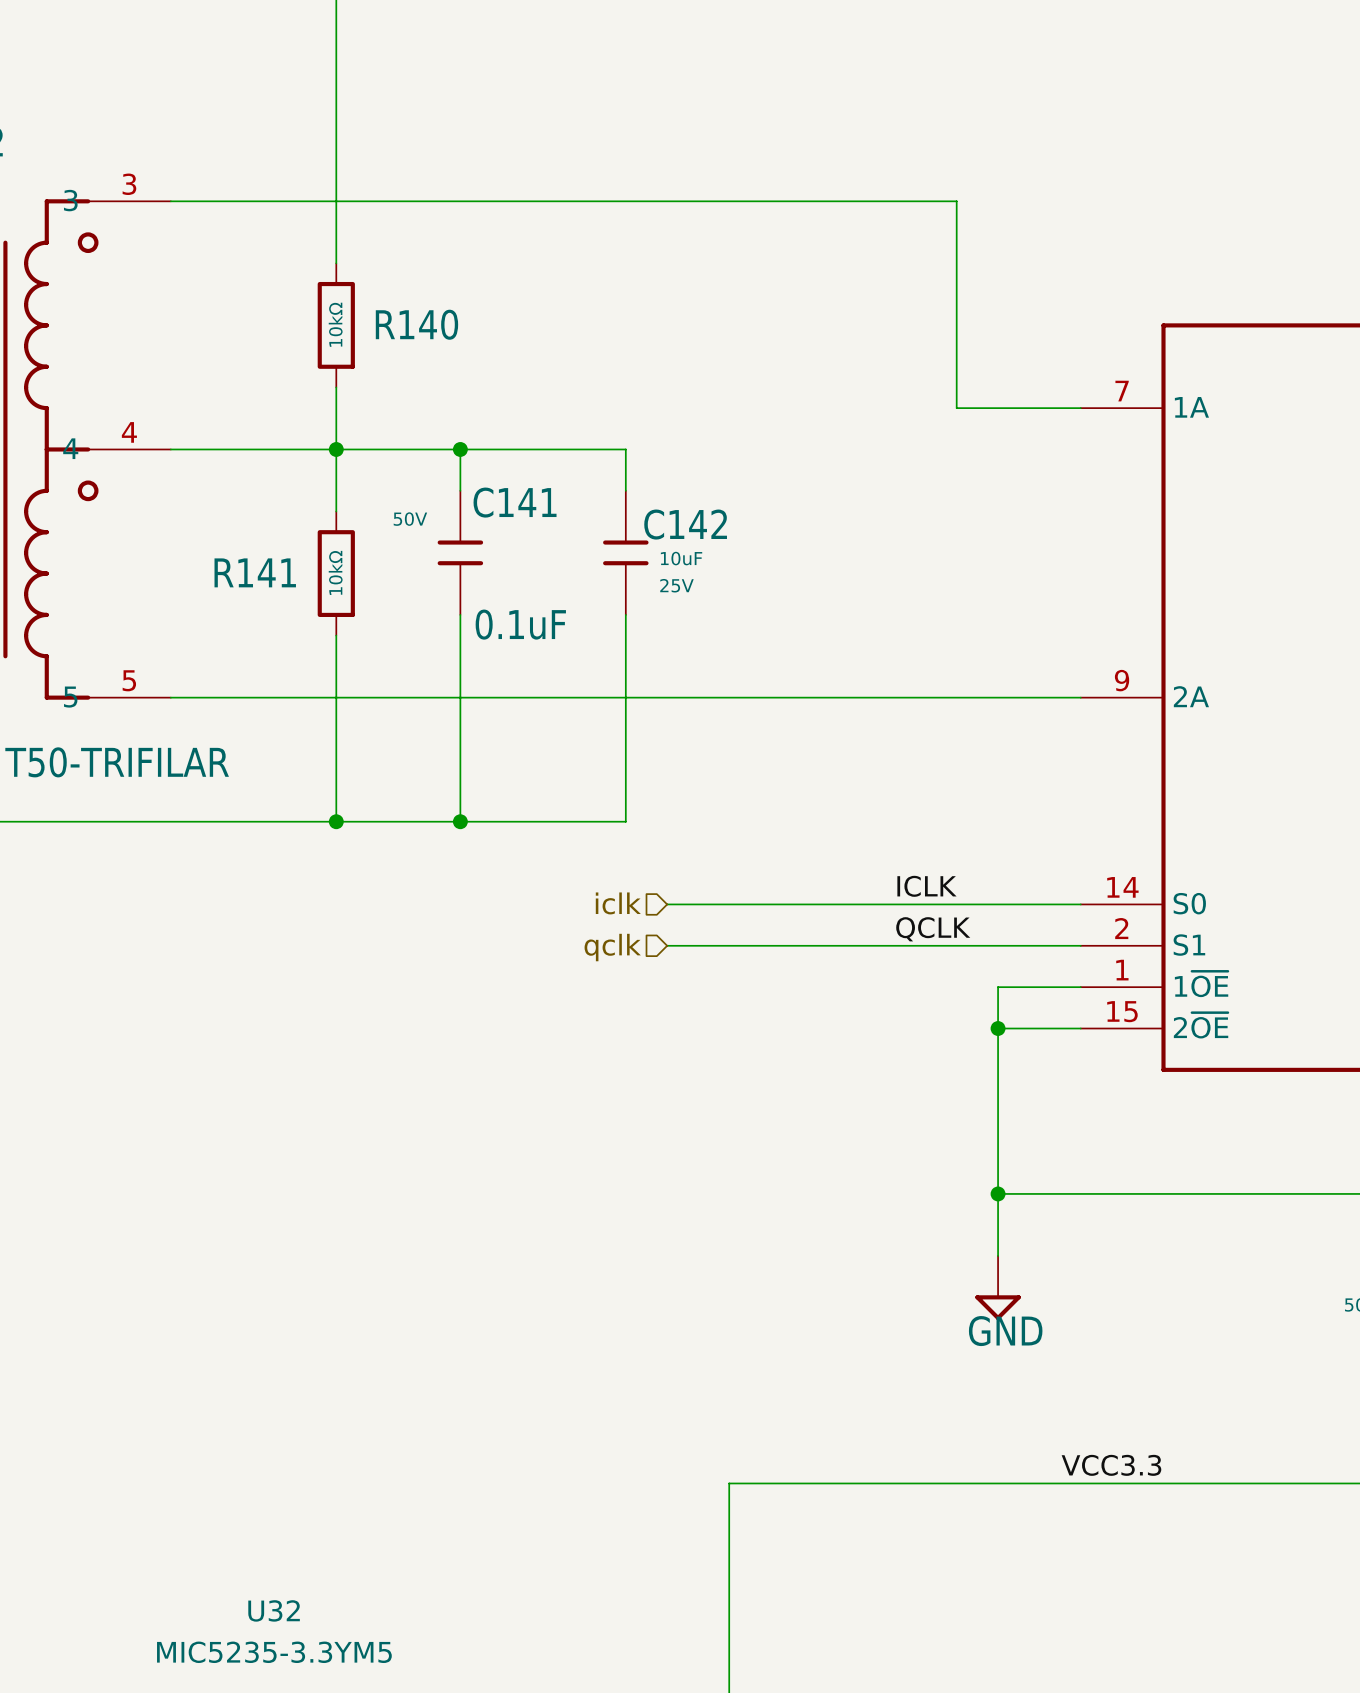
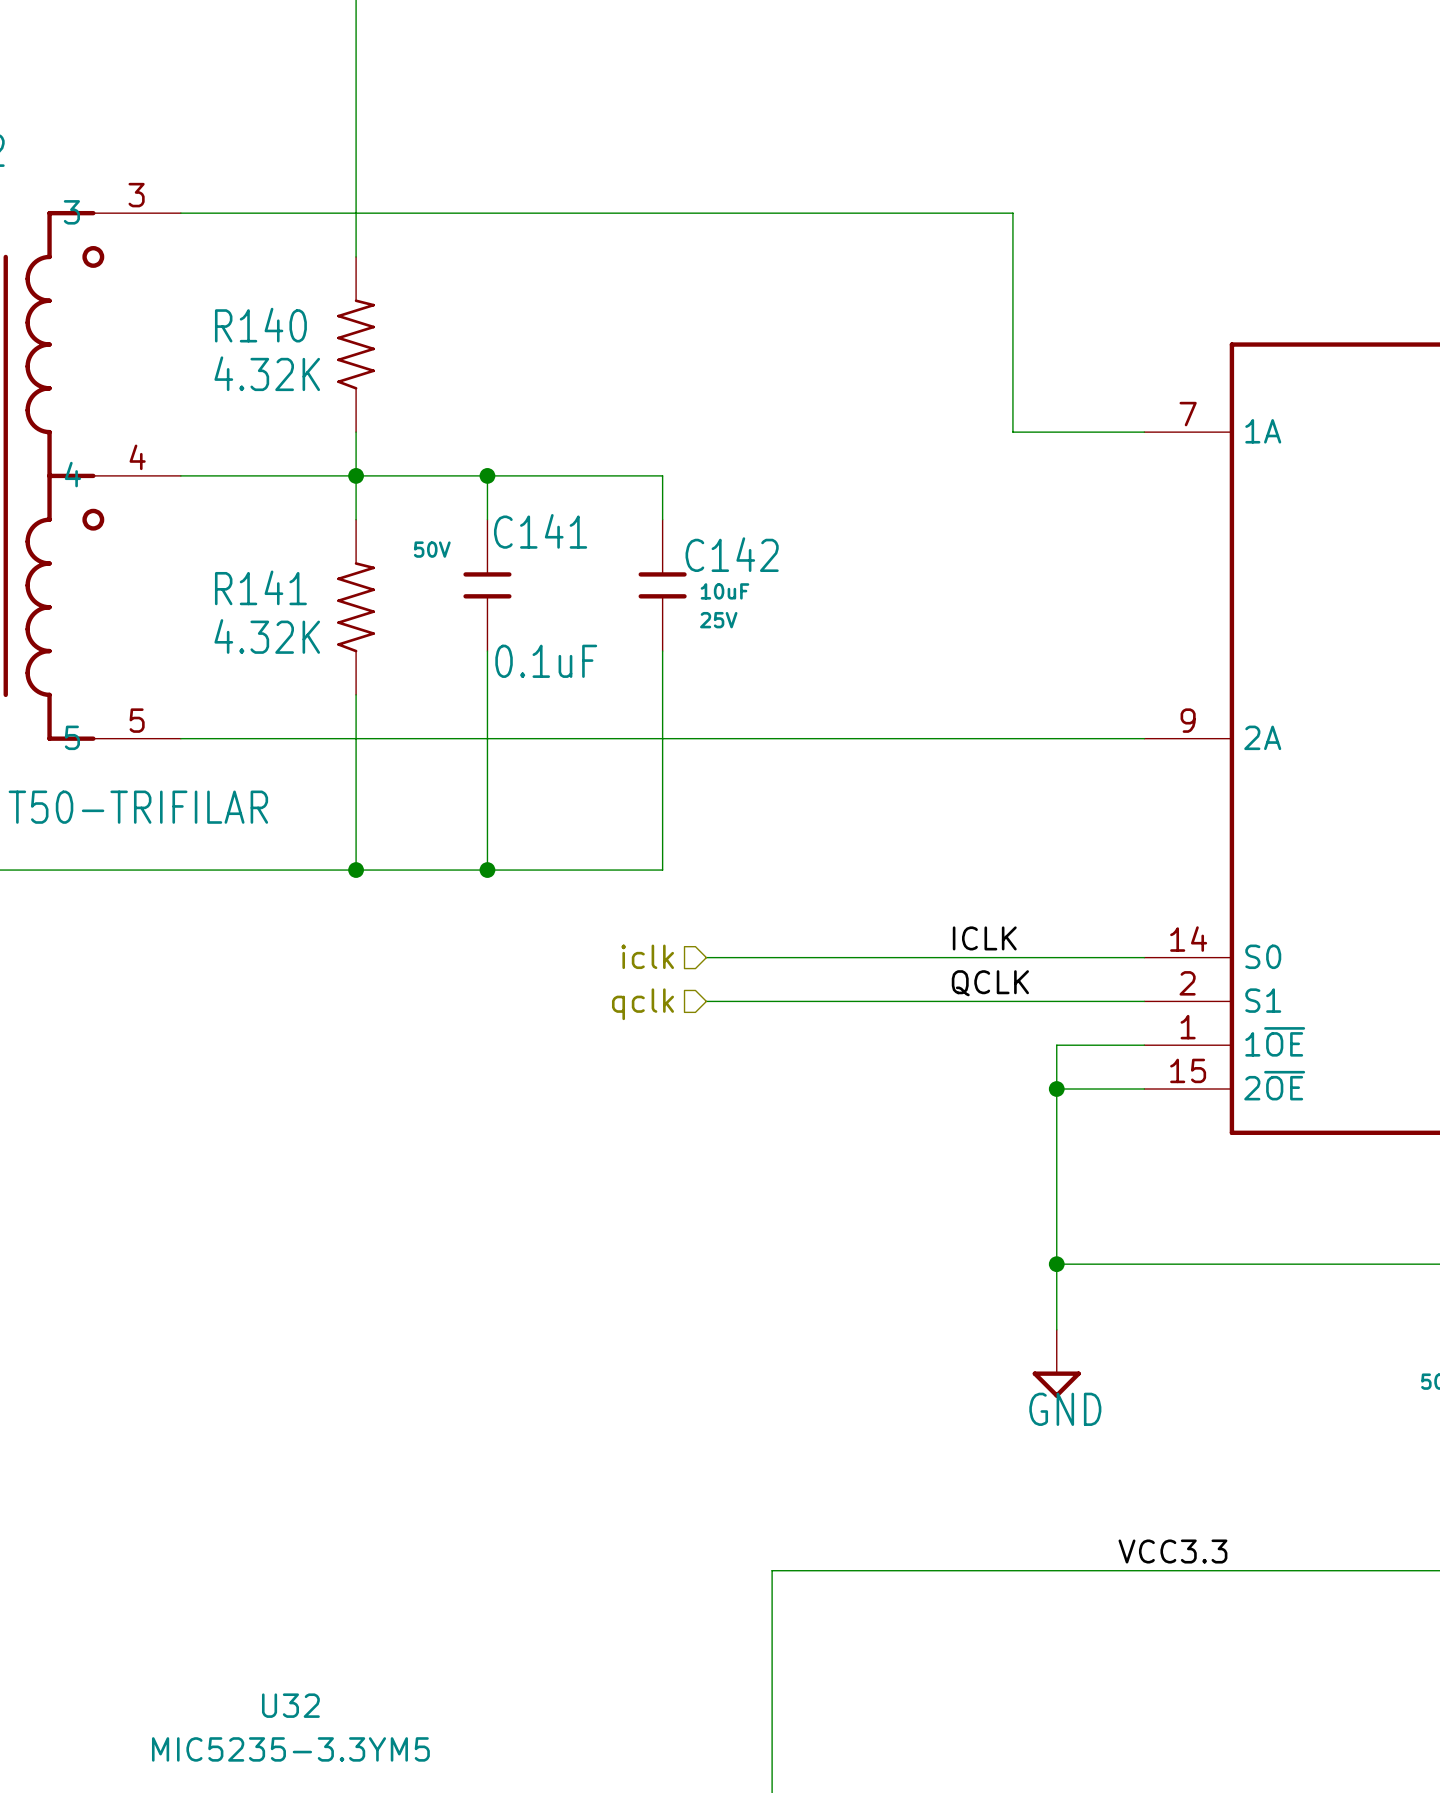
R140 symbol: [317, 263, 355, 388] -> [337, 256, 375, 433]
R140 value: 10kΩ (335, 324) -> 4.32K (267, 373)
R140 name position: R140 (416, 324) -> R140 (260, 325)
R141 symbol: [317, 511, 355, 636] -> [337, 519, 375, 695]
R141 value: 10kΩ (335, 572) -> 4.32K (267, 636)

